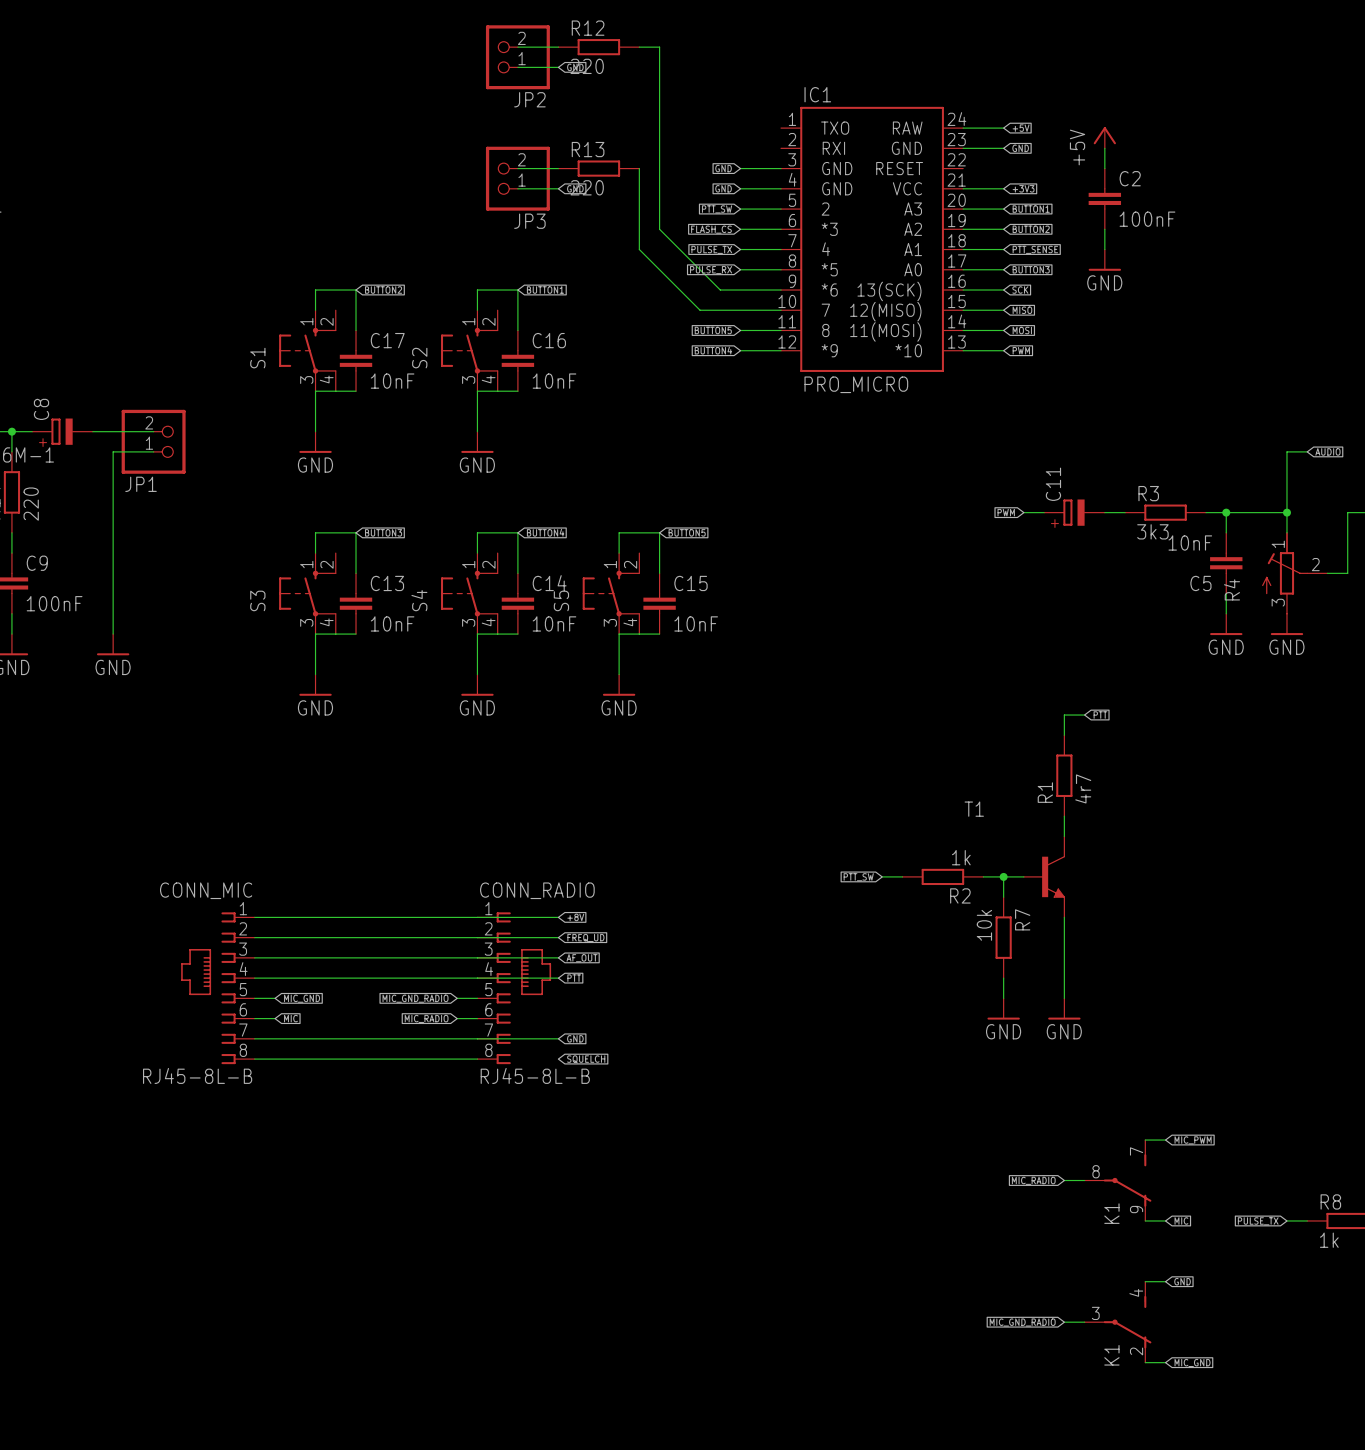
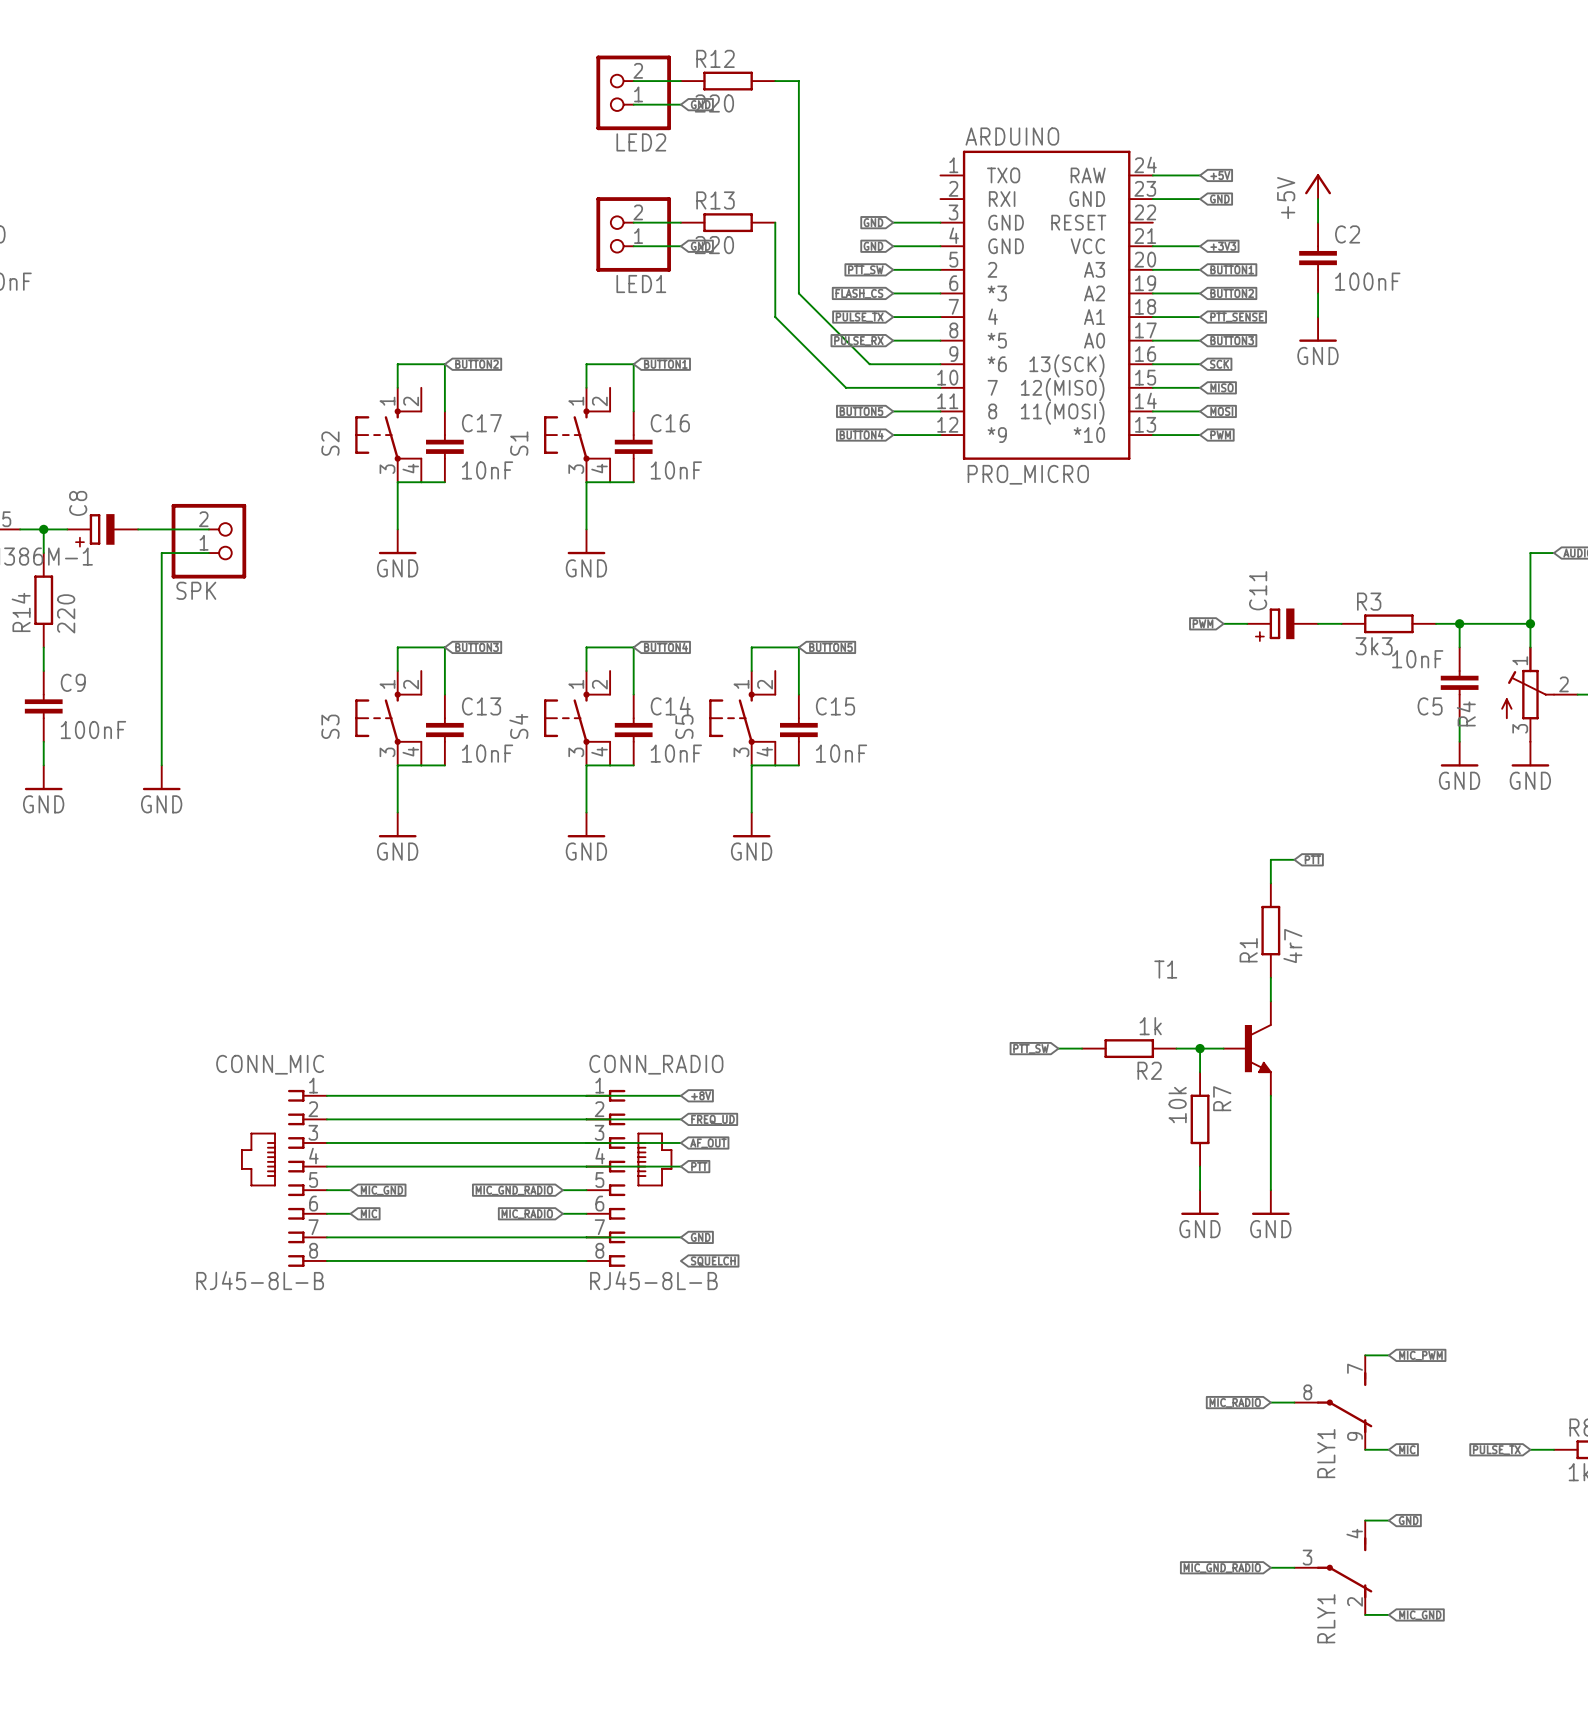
IC1 name: IC1 (817, 94) -> ARDUINO (1012, 136)
JP2 name: JP2 (529, 99) -> LED2 (641, 142)
JP3 name: JP3 (529, 221) -> LED1 (641, 284)
S1 name: S1 (257, 358) -> S2 (330, 443)
S2 name: S2 (419, 358) -> S1 (519, 443)
JP1 name: JP1 (141, 484) -> SPK (196, 590)
K1 name: K1 (1111, 1213) -> RLY1 (1326, 1453)
K1 name: K1 (1111, 1355) -> RLY1 (1326, 1618)

